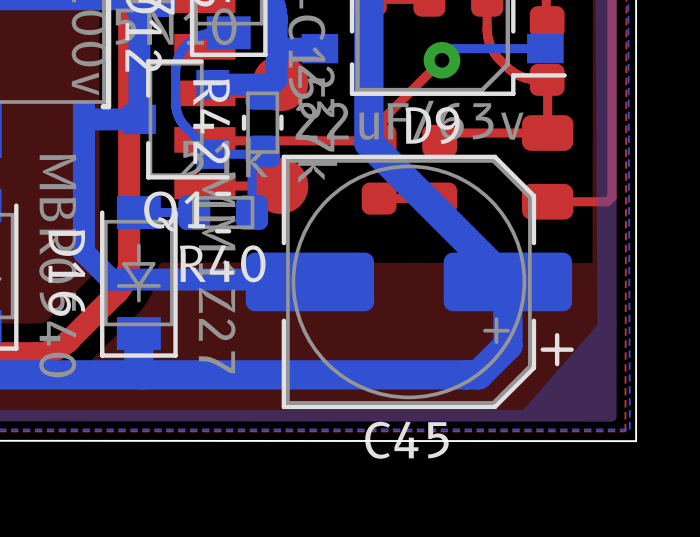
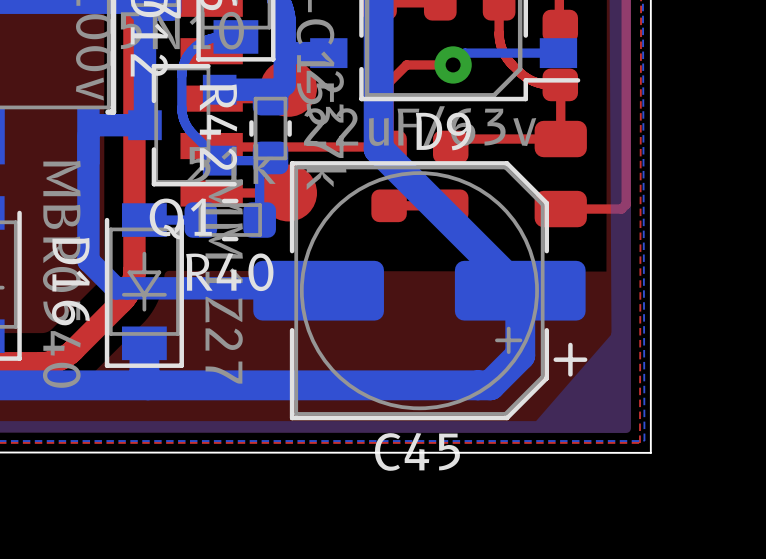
top track: (441, 60) (387, 115) (381, 125) (379, 137) -> (453, 64) (406, 64) (389, 82) (389, 143)

